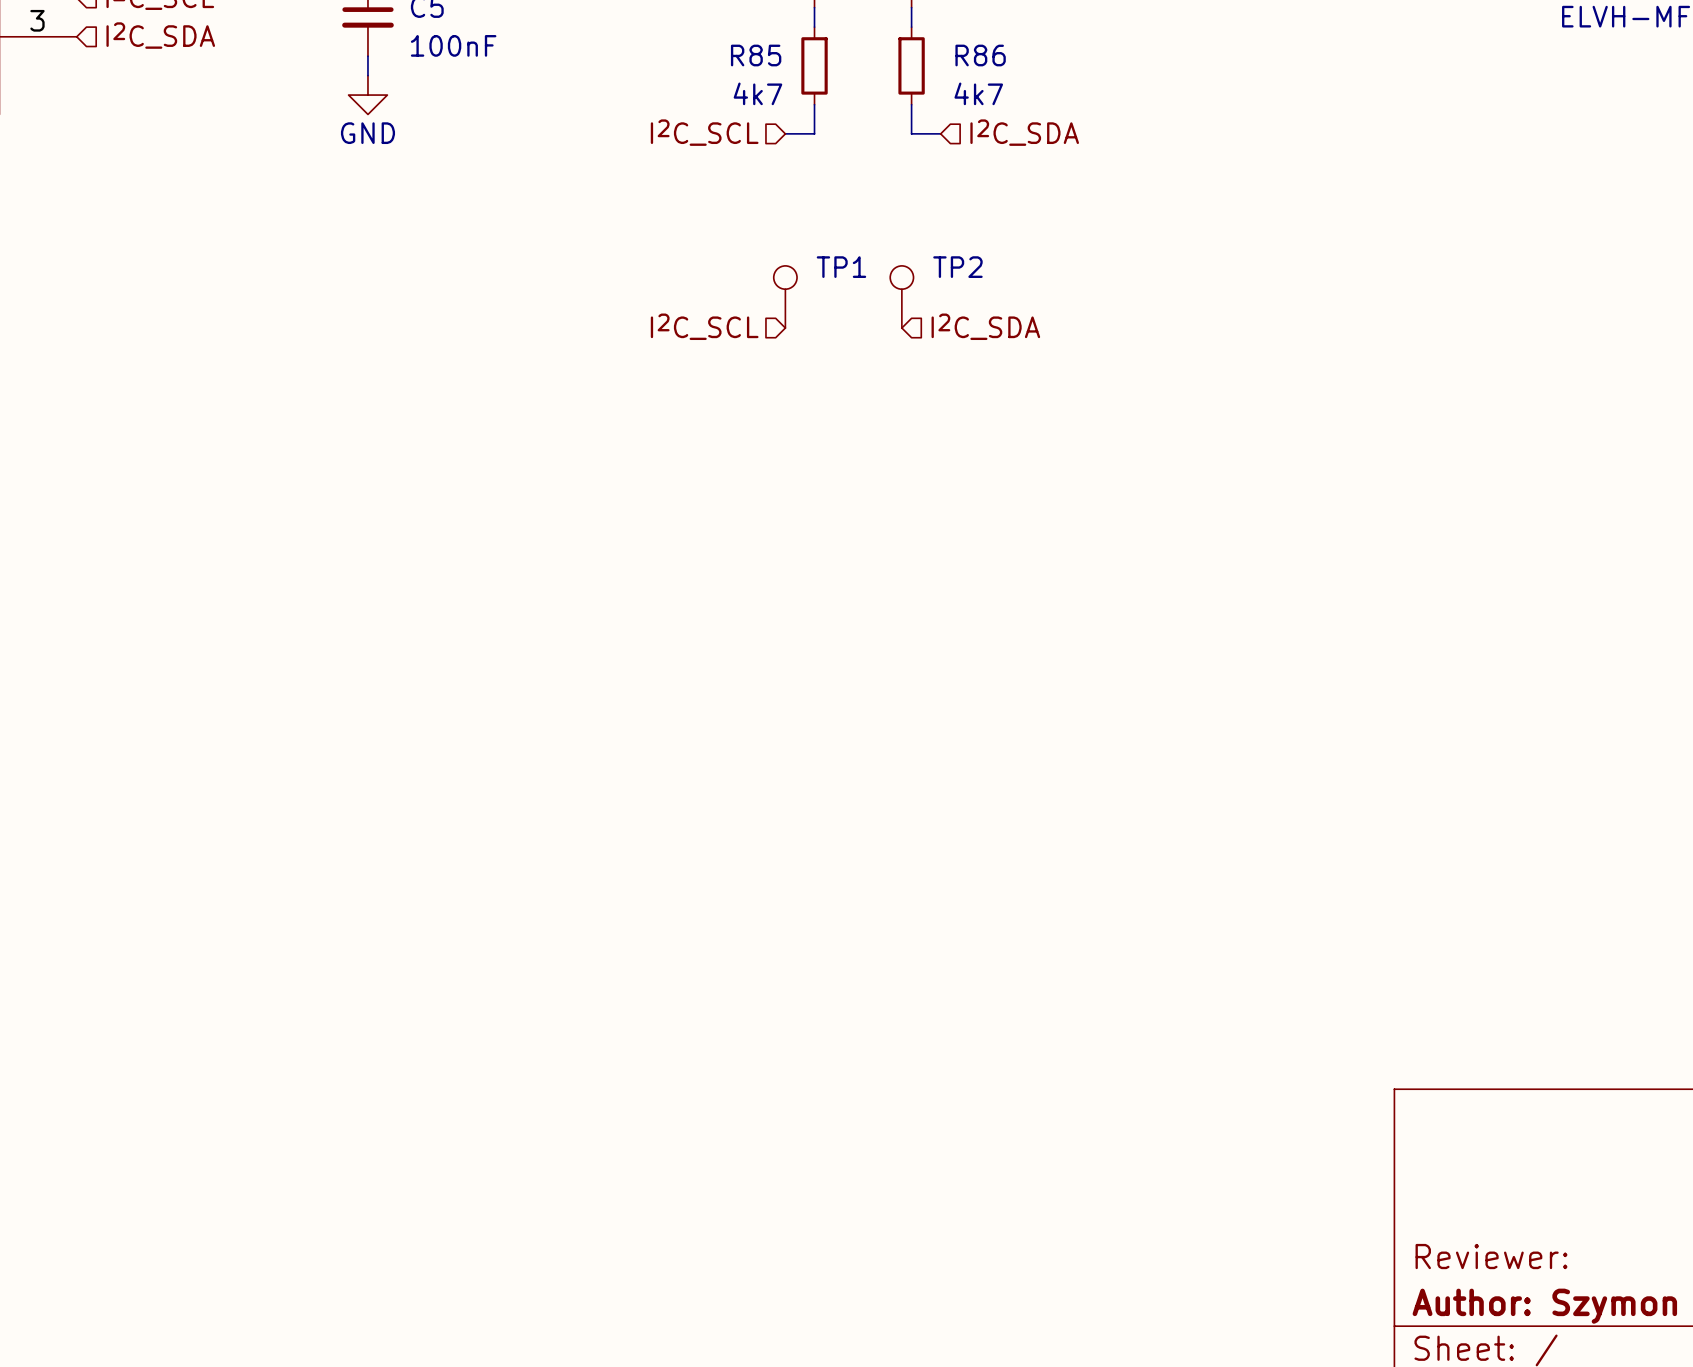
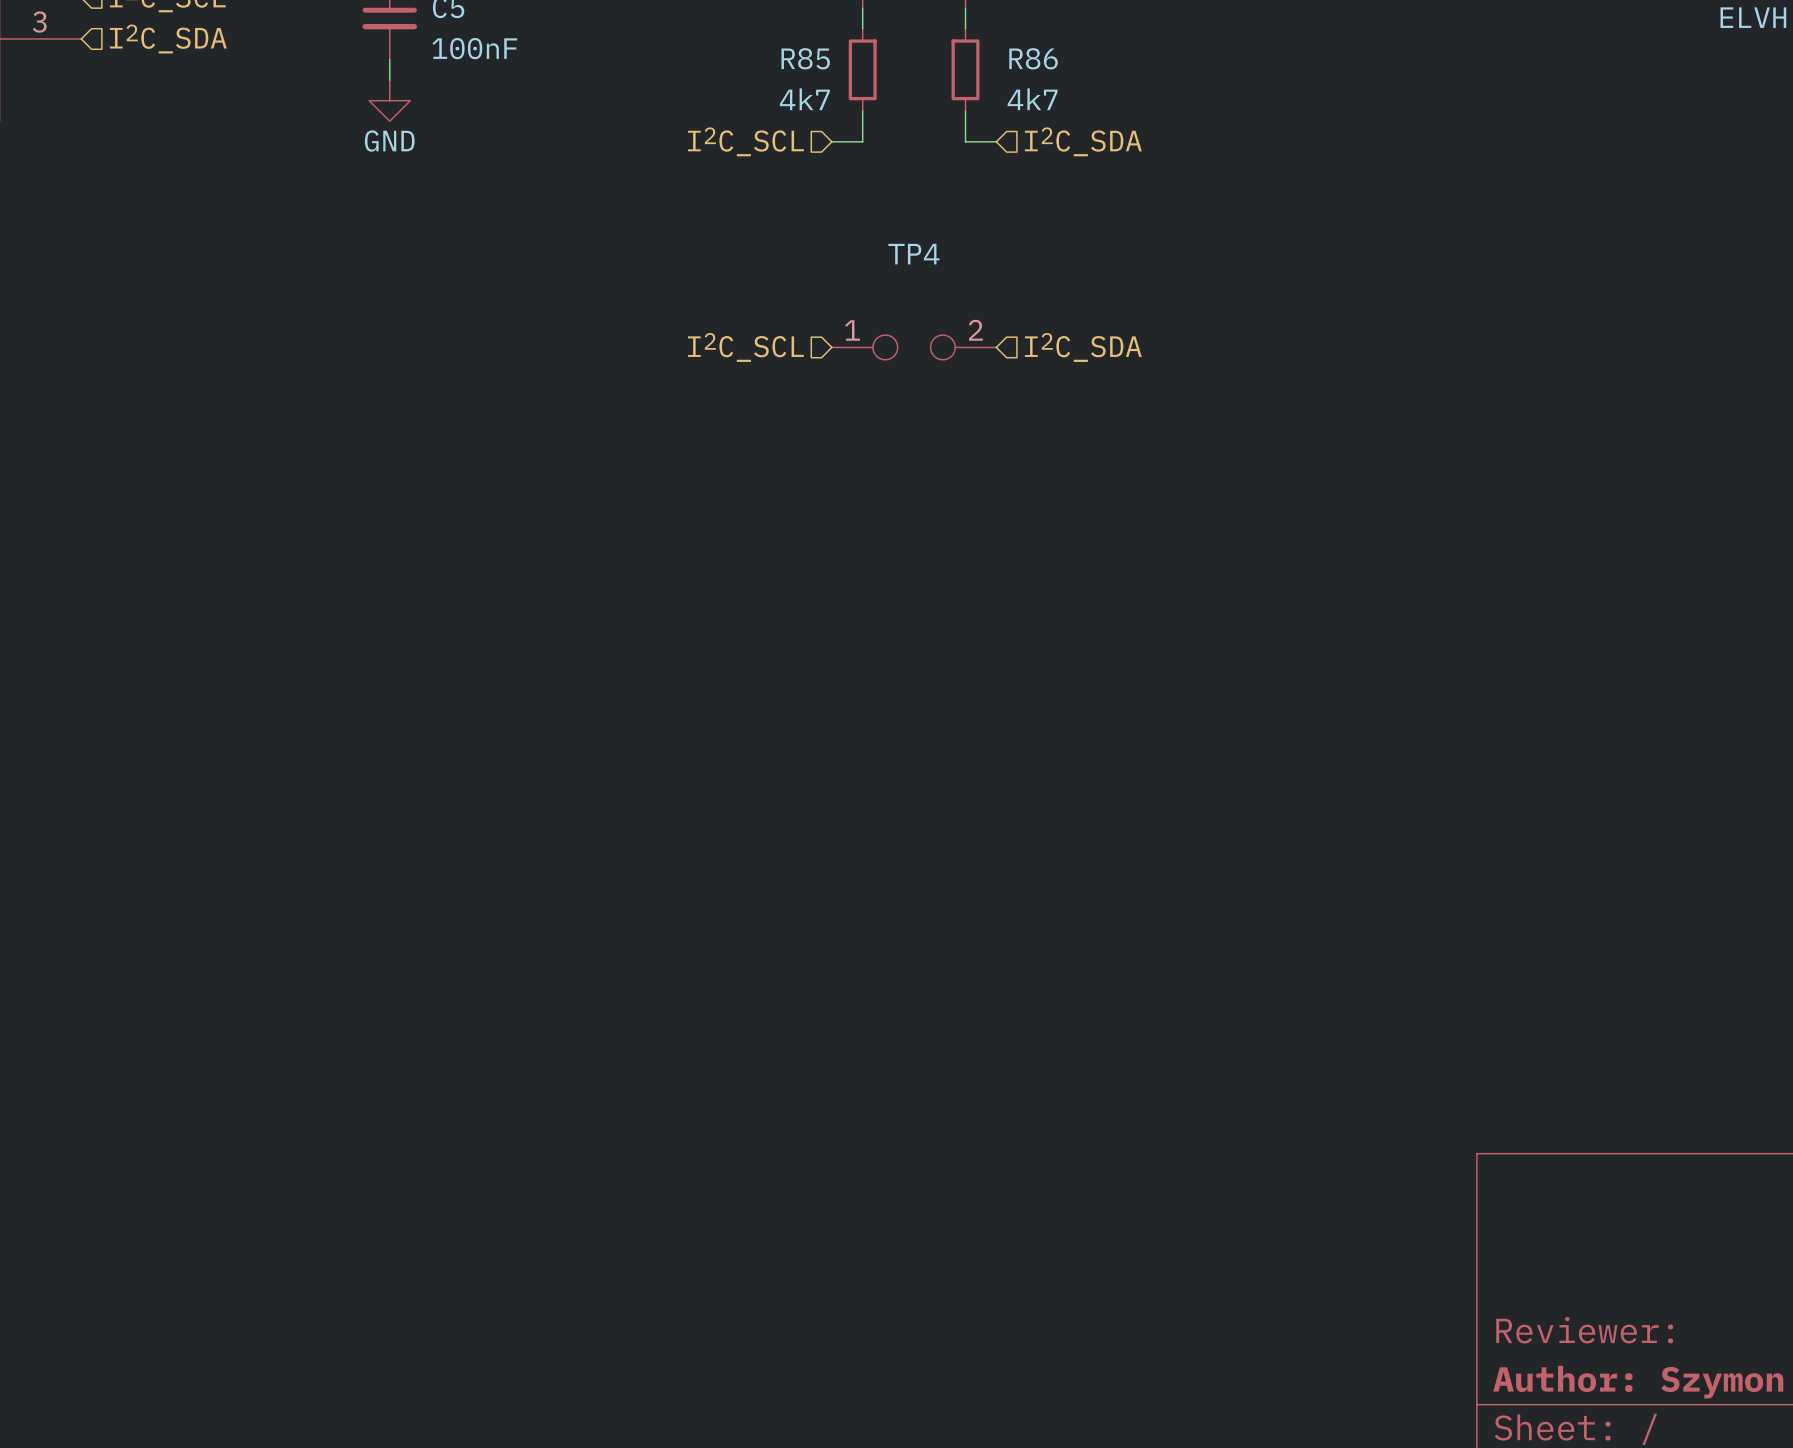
TP1: (785, 296) -> none
TP2: (901, 296) -> none
hierarchical label position: I2C_SDA (985, 326) -> I2C_SDA (1083, 347)
TP4: none -> (914, 347)

